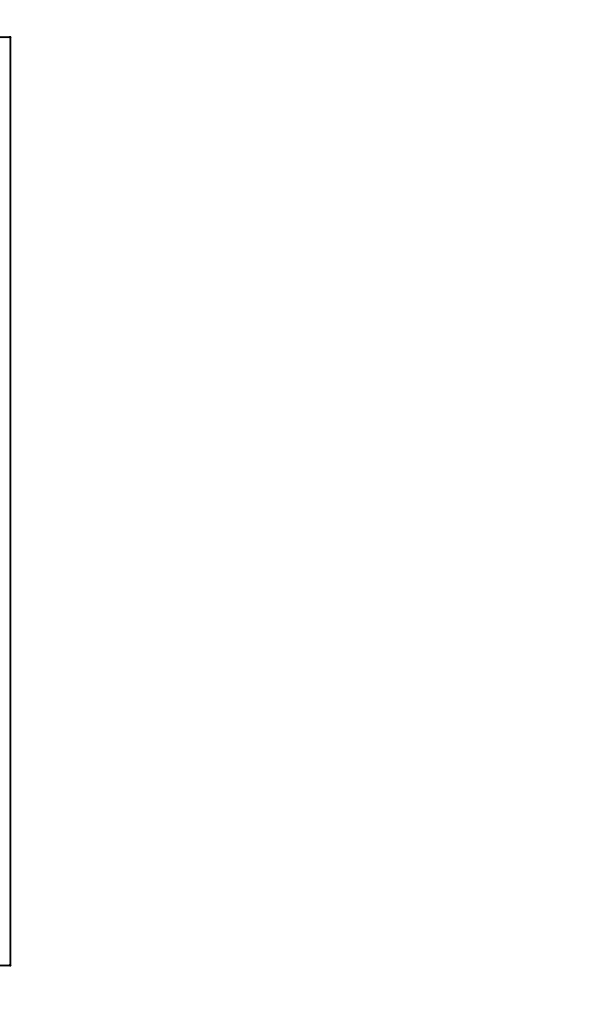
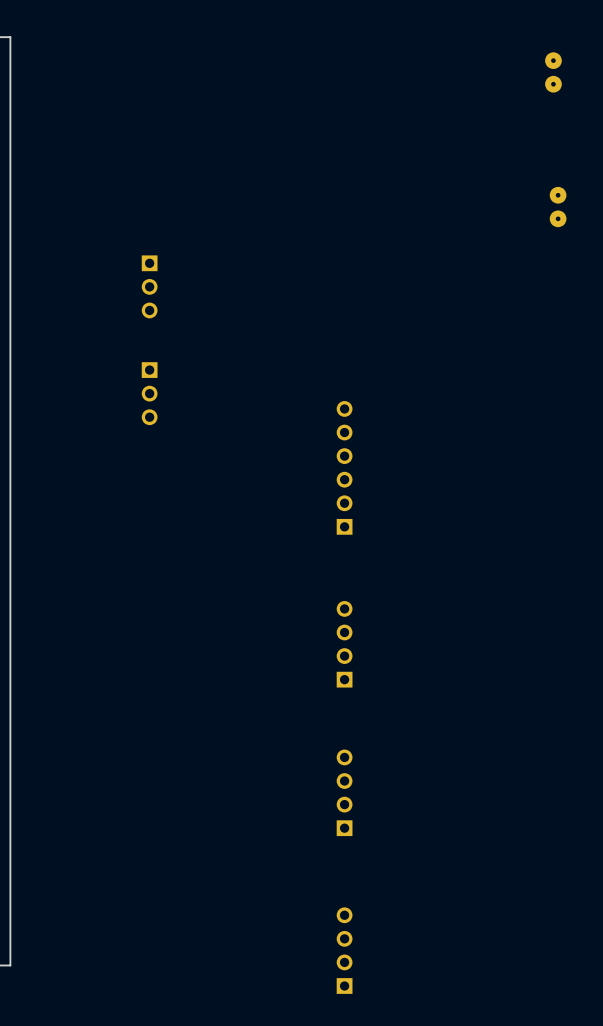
part: none -> (553, 72)
part: none -> (558, 207)
part: none -> (149, 286)
part: none -> (149, 393)
part: none -> (344, 467)
part: none -> (344, 644)
part: none -> (344, 792)
part: none -> (344, 950)

